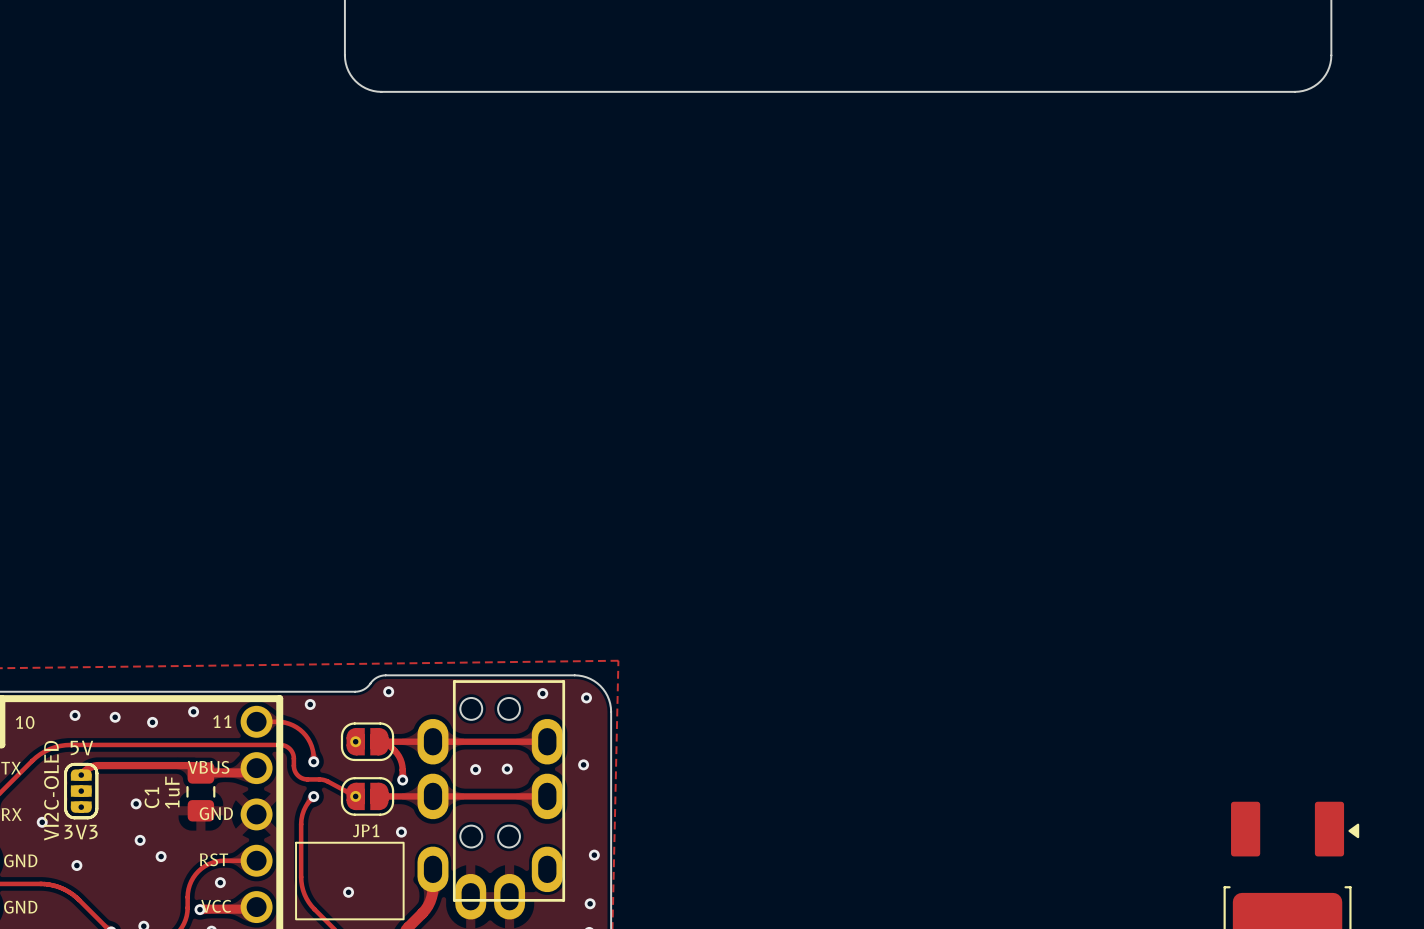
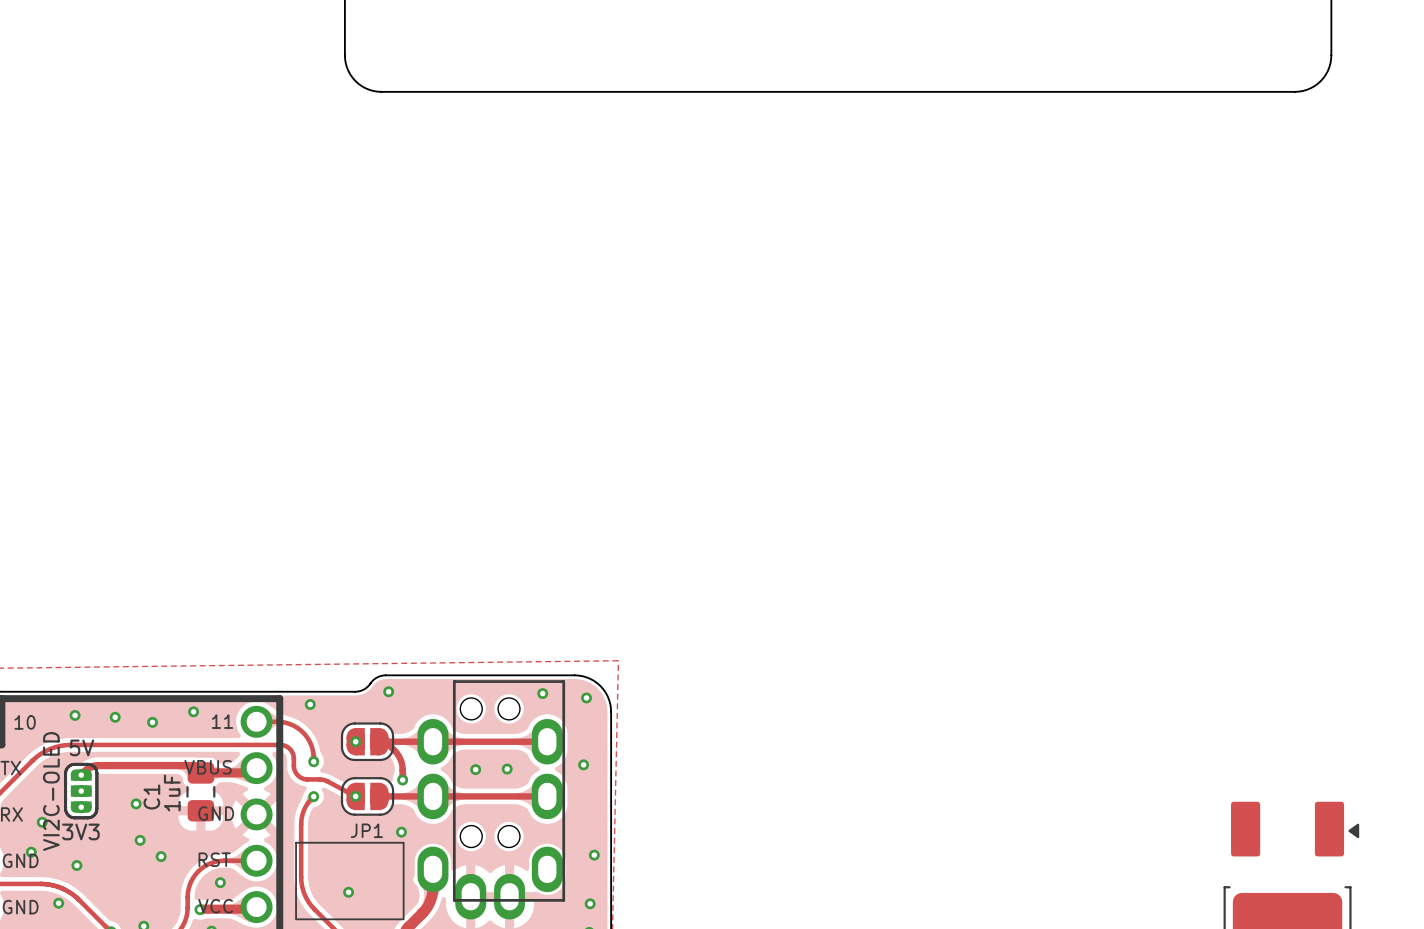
via: none -> (31, 852)
via: none -> (58, 903)

